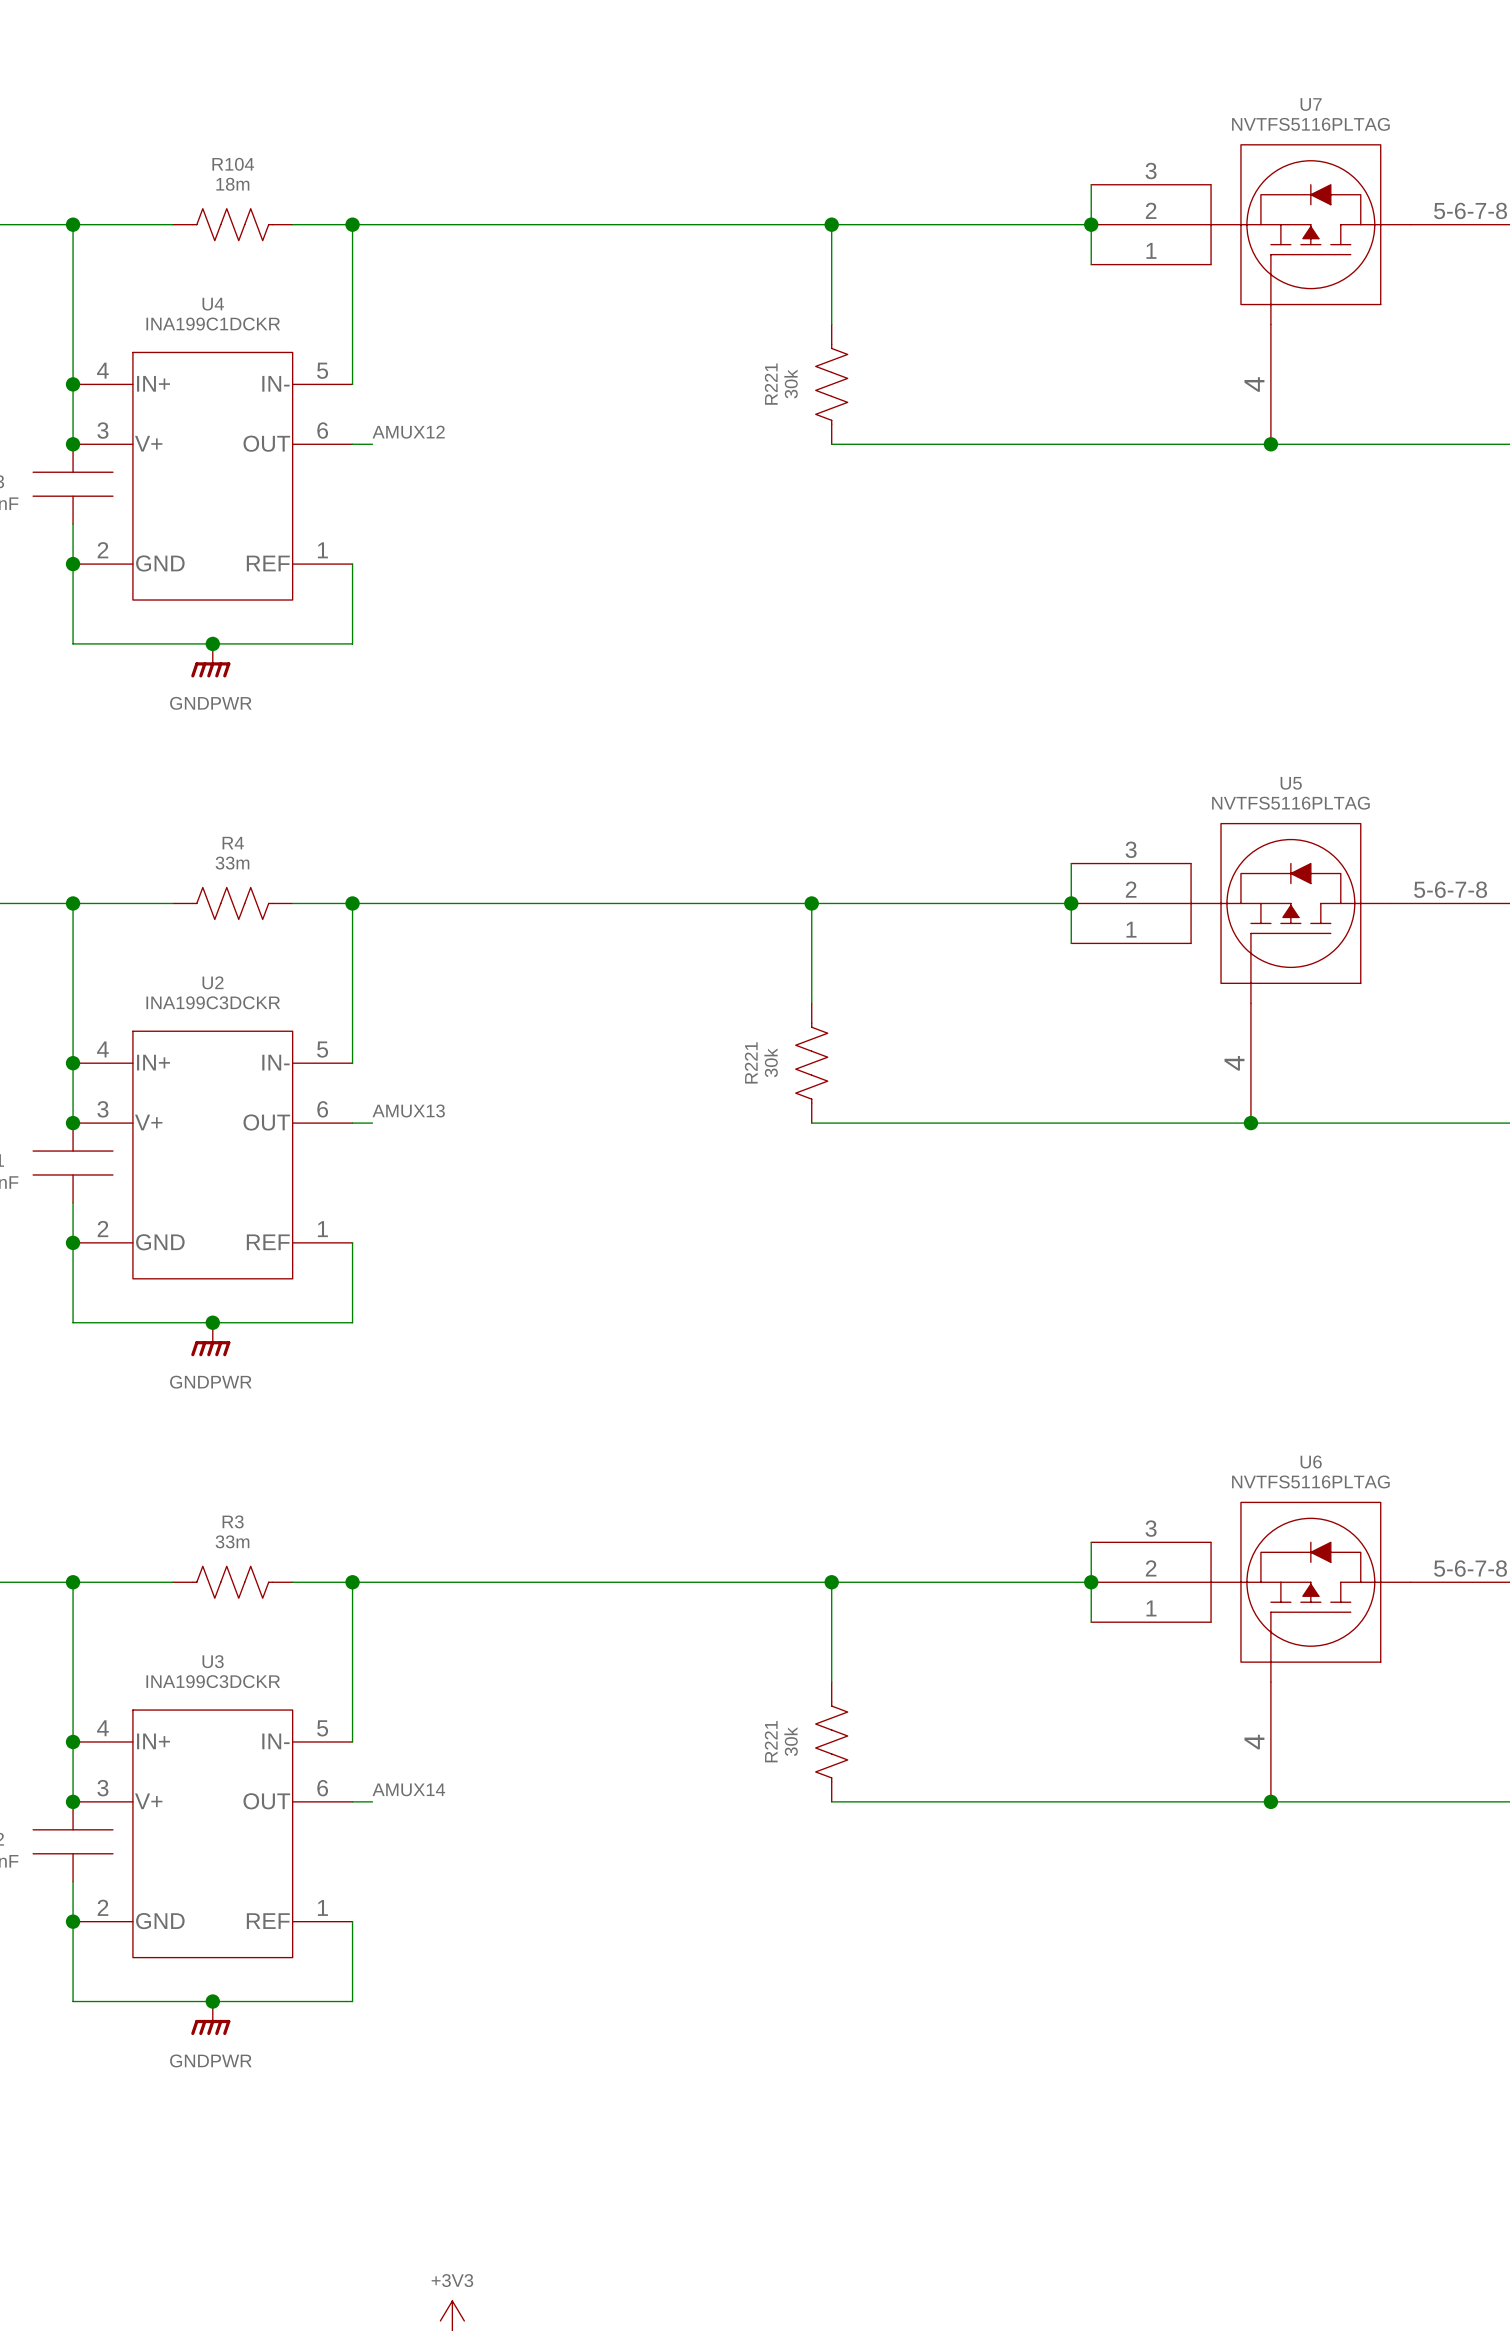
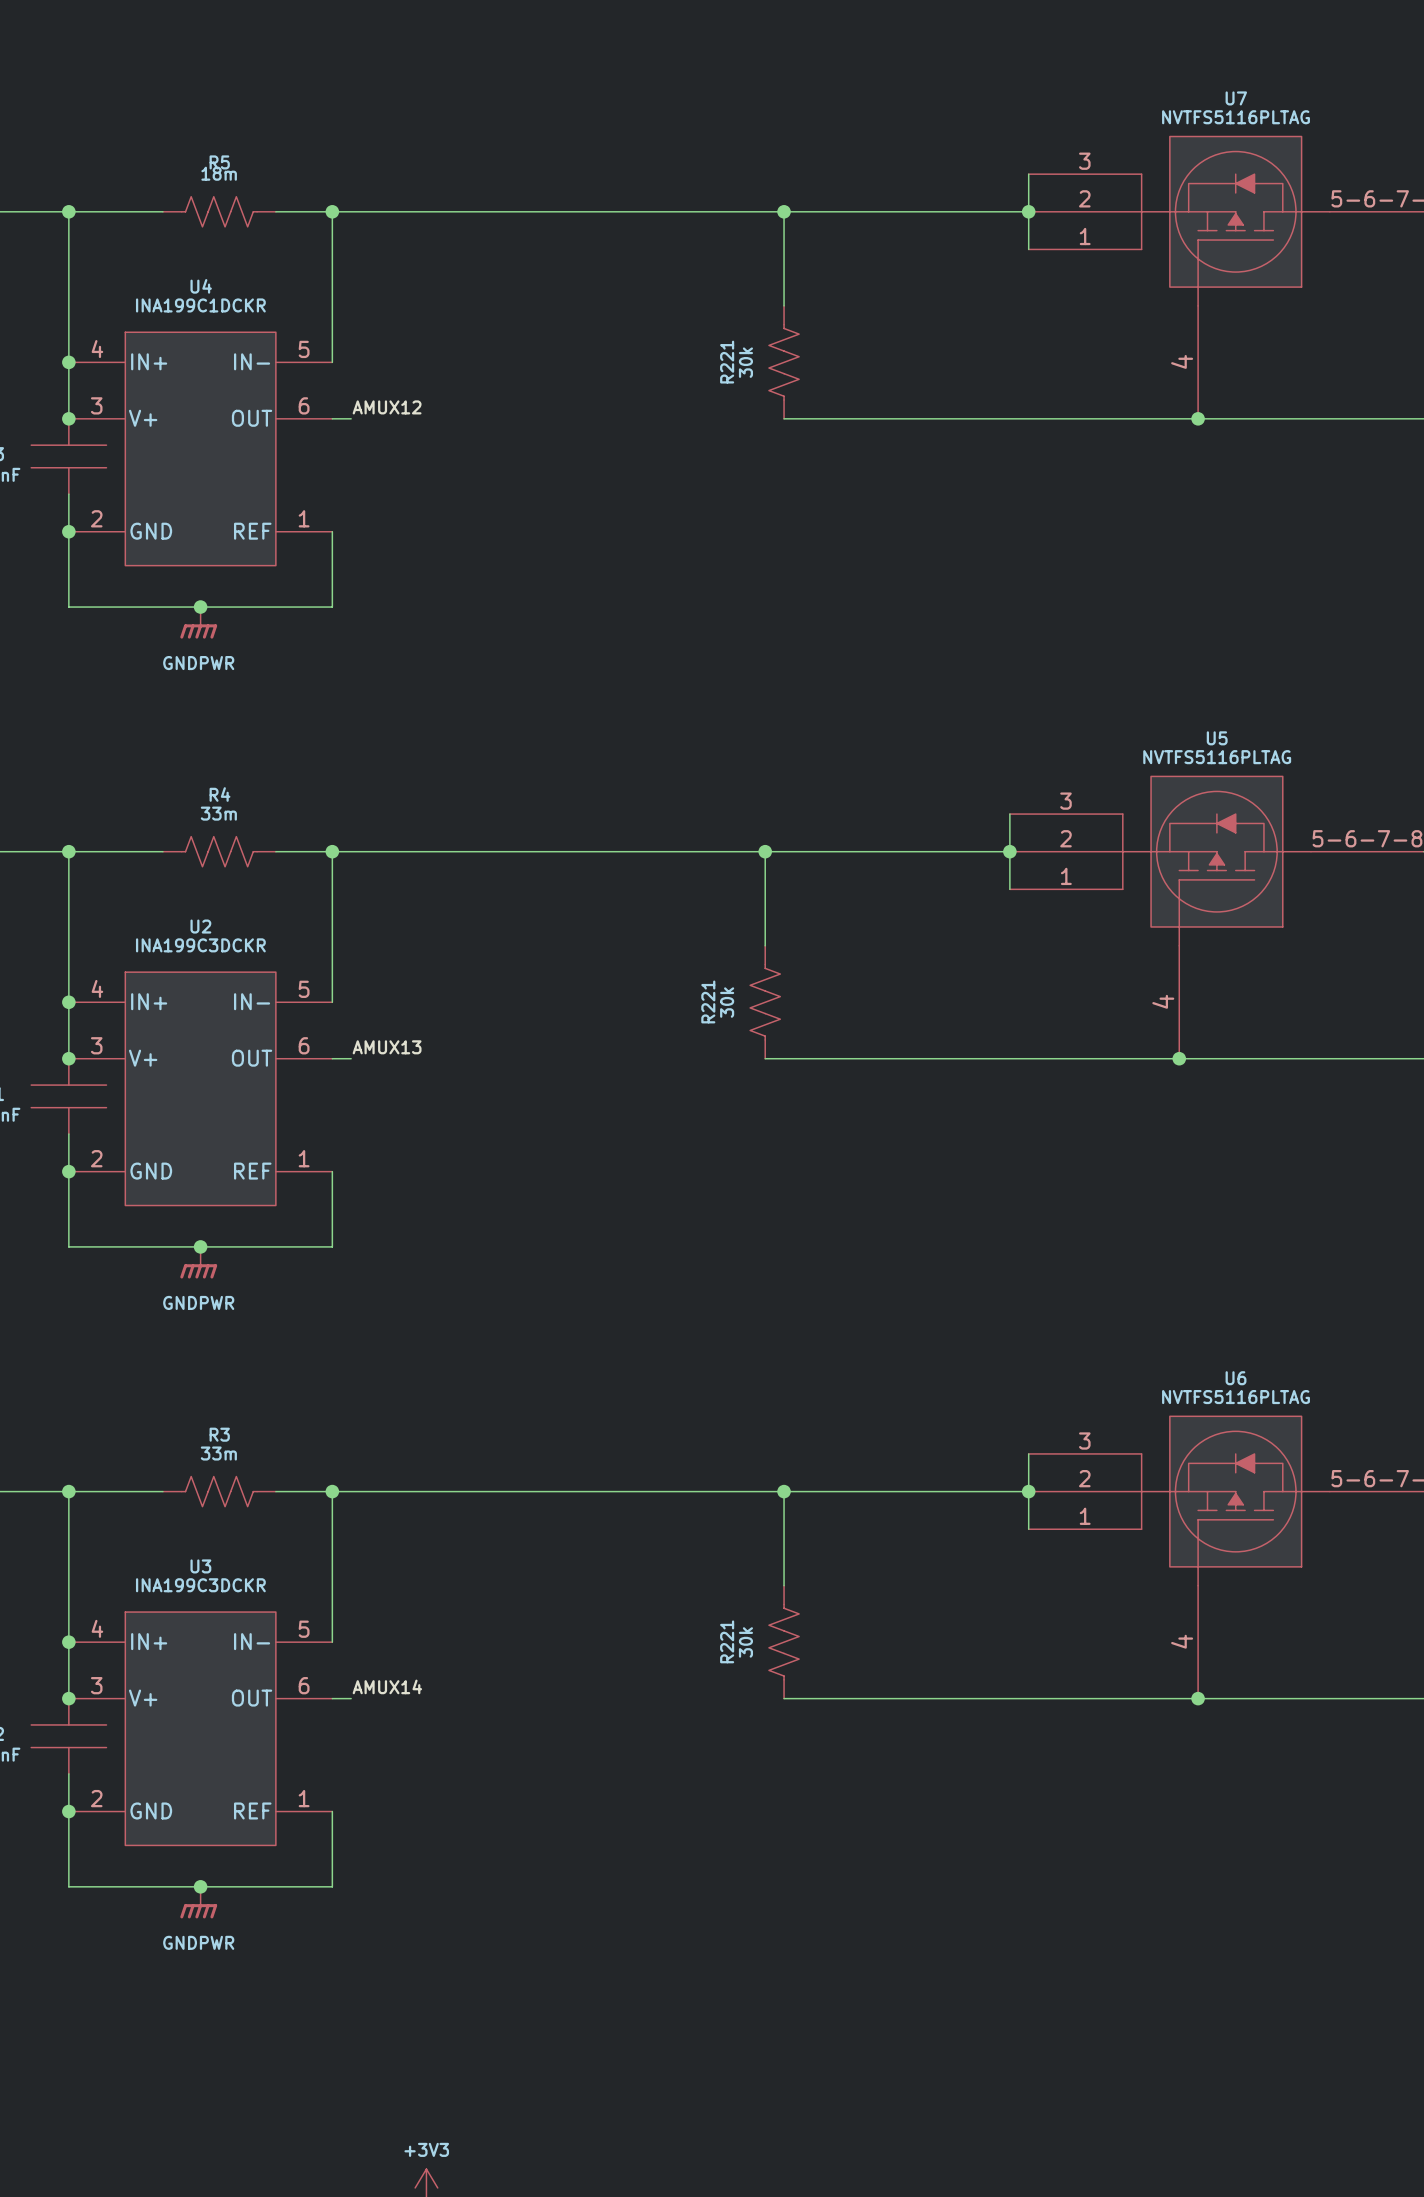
R104 name: R104 (233, 164) -> R5 (219, 162)

